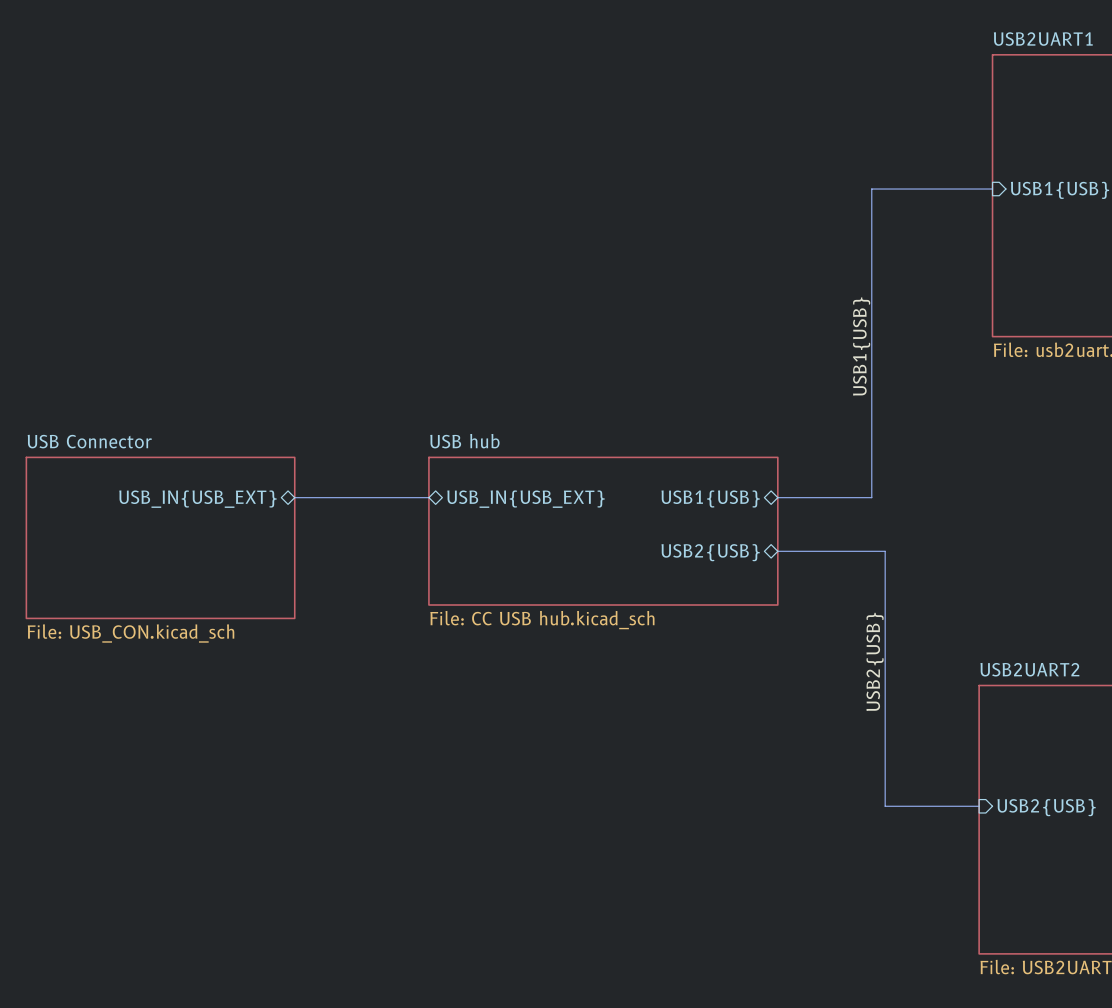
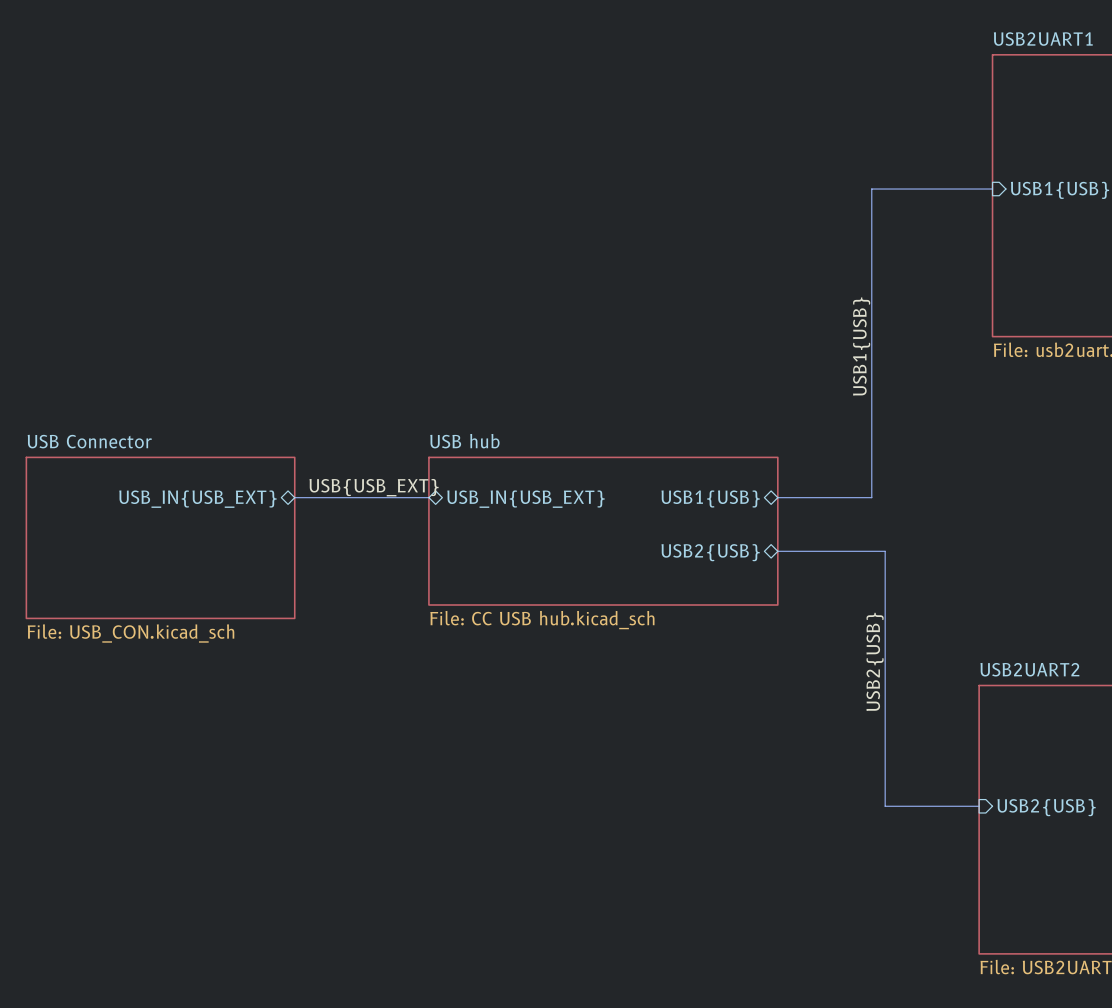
label: none -> USB{USB_EXT} (374, 487)

